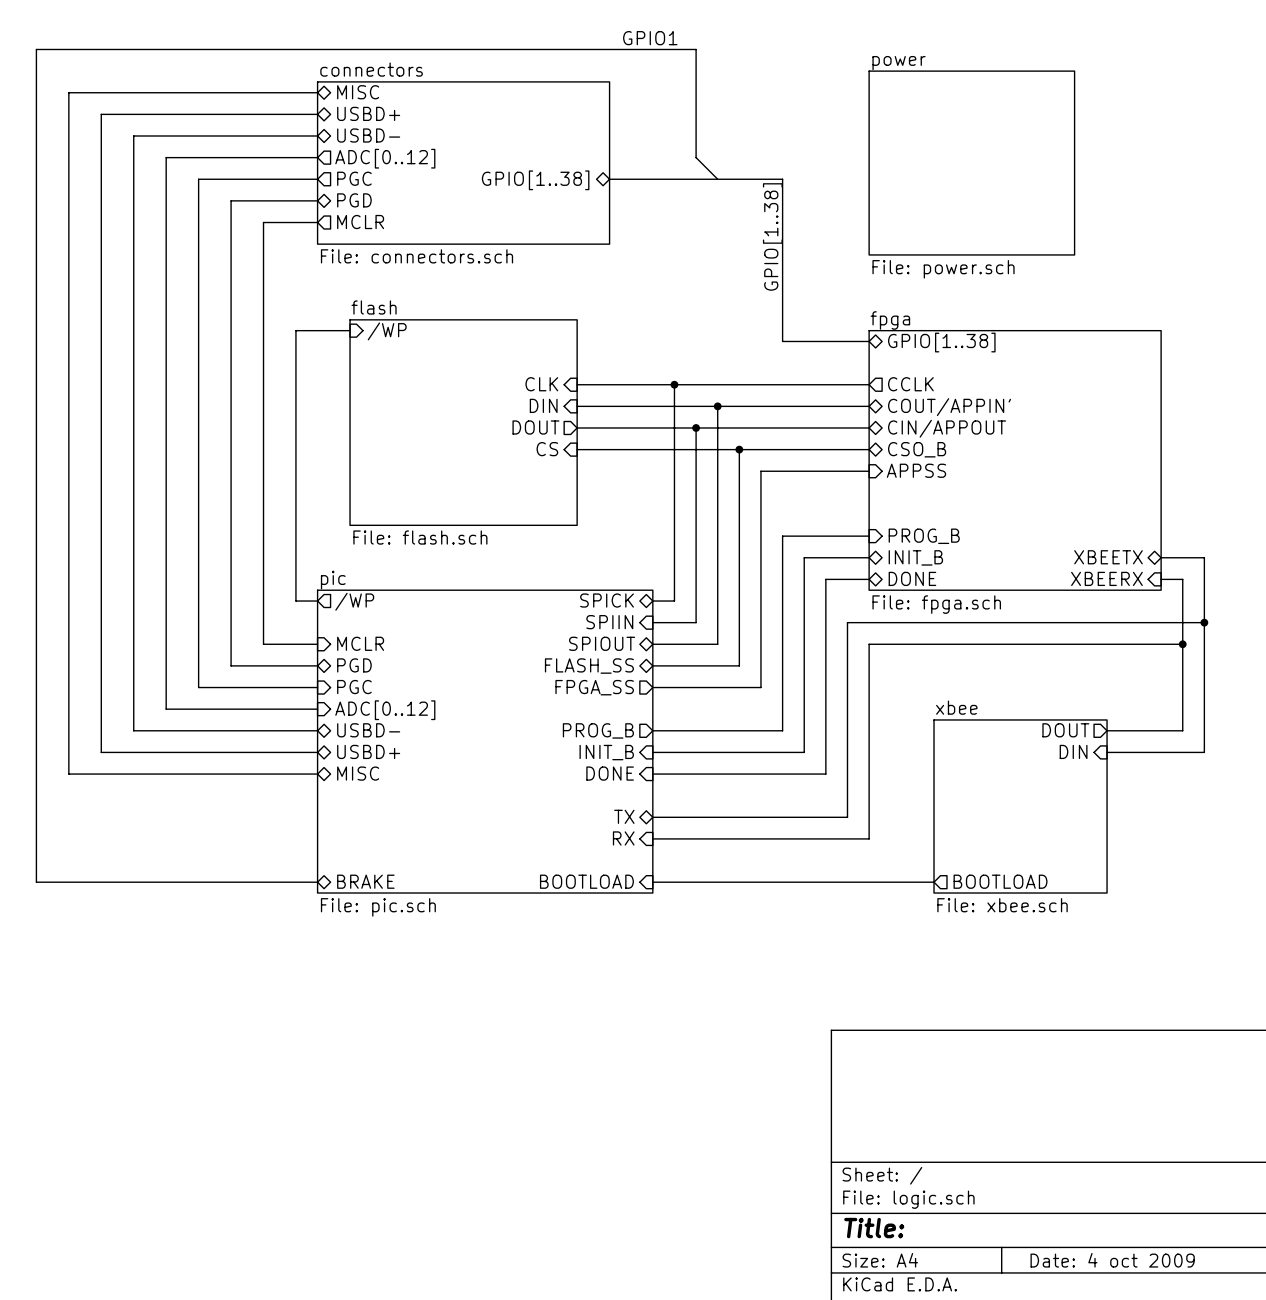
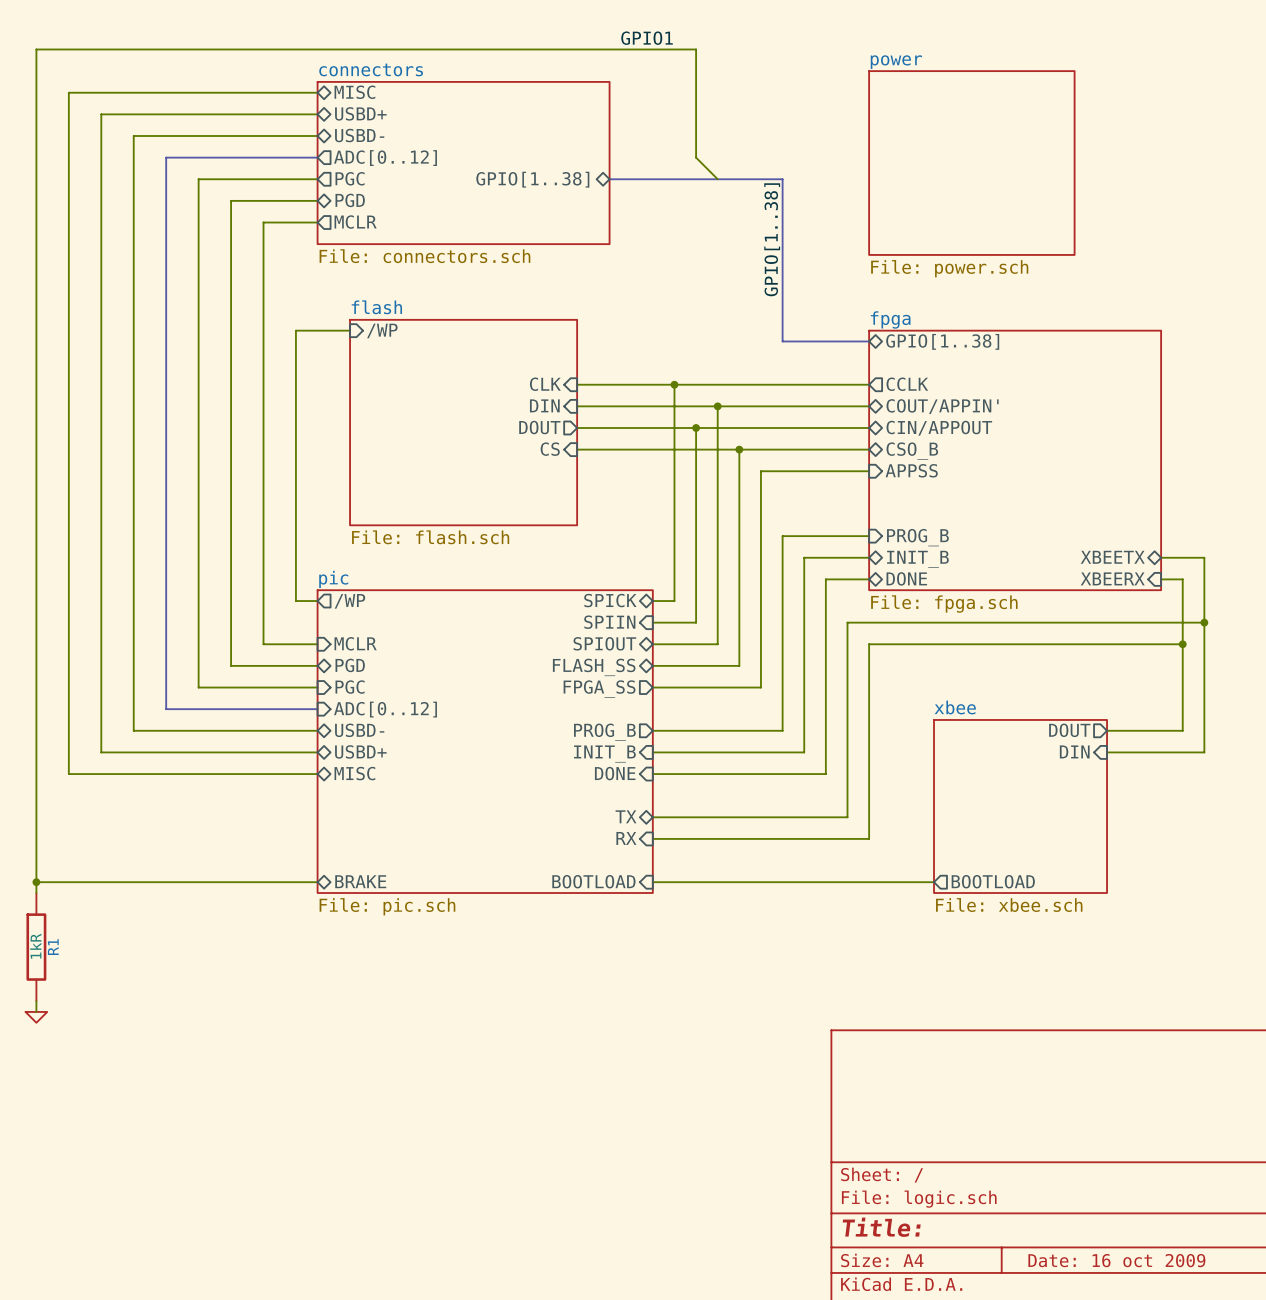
wire: none -> (36, 882) (36, 893)
junction: none -> (36, 882)
R1: none -> 1kR (36, 947)
wire: none -> (36, 1001) (36, 1011)
power symbol: none -> (36, 1017)
title block: Date: 4 oct 2009 (1112, 1260) -> Date: 16 oct 2009 (1116, 1260)

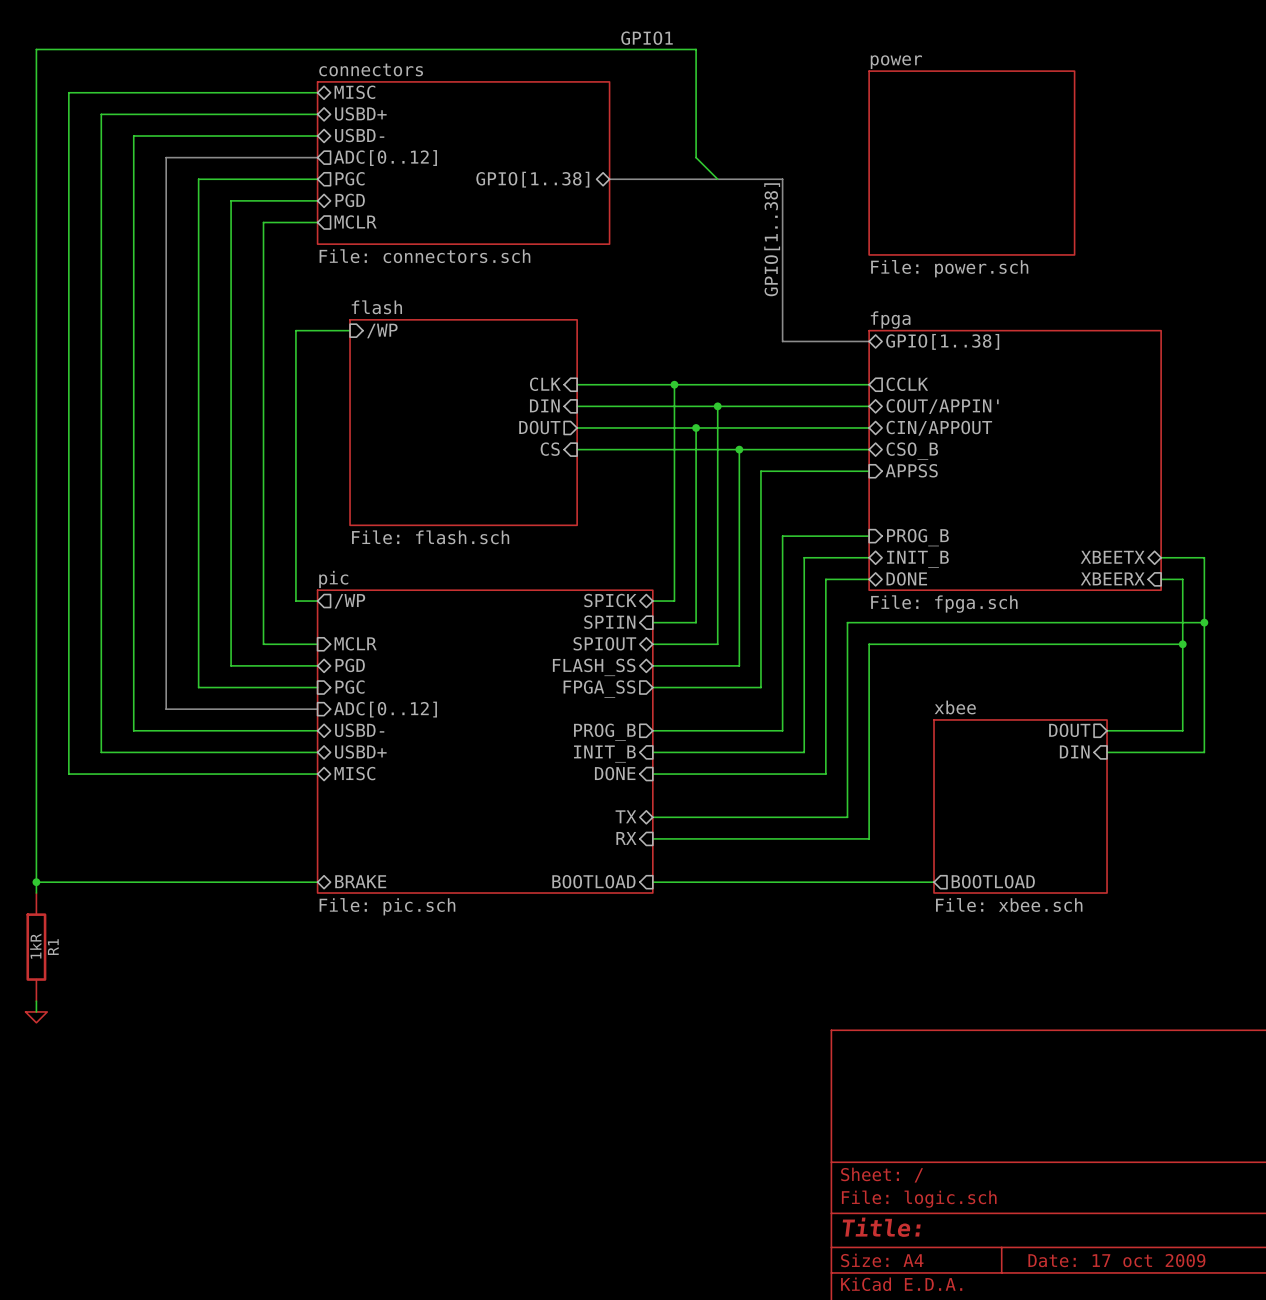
title block: Date: 16 oct 2009 (1116, 1260) -> Date: 17 oct 2009 (1116, 1260)

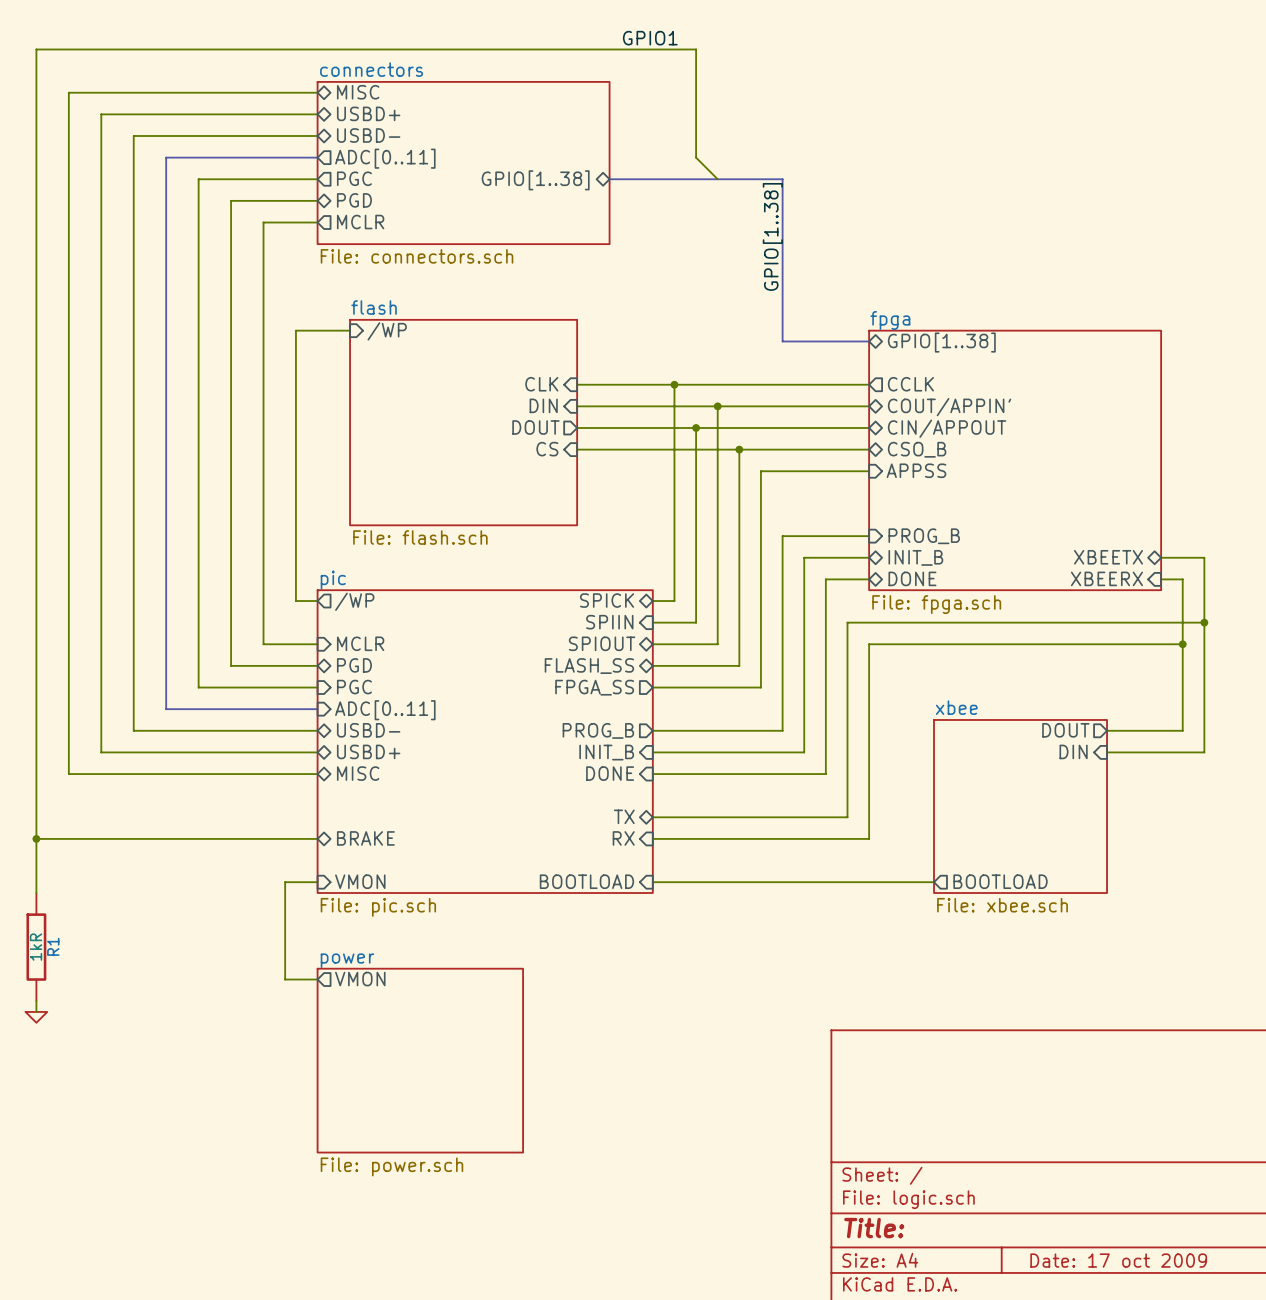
sheet pin: ADC[0..12] (385, 158) -> ADC[0..11] (385, 158)
sheet power: File: power.sch (971, 163) -> none
sheet pin: ADC[0..12] (385, 709) -> ADC[0..11] (385, 710)
wire: none -> (36, 838) (317, 838)
sheet pin: none -> BRAKE (365, 838)
sheet pin shape: bidirectional (360, 881) -> input (360, 881)
sheet pin: BRAKE (360, 881) -> VMON (360, 881)
wire: (36, 882) (285, 882) -> (317, 979) (285, 979) (285, 882)
junction position: (36, 882) -> (36, 838)
sheet pin: none -> VMON (360, 979)
sheet power: none -> File: power.sch (420, 1060)

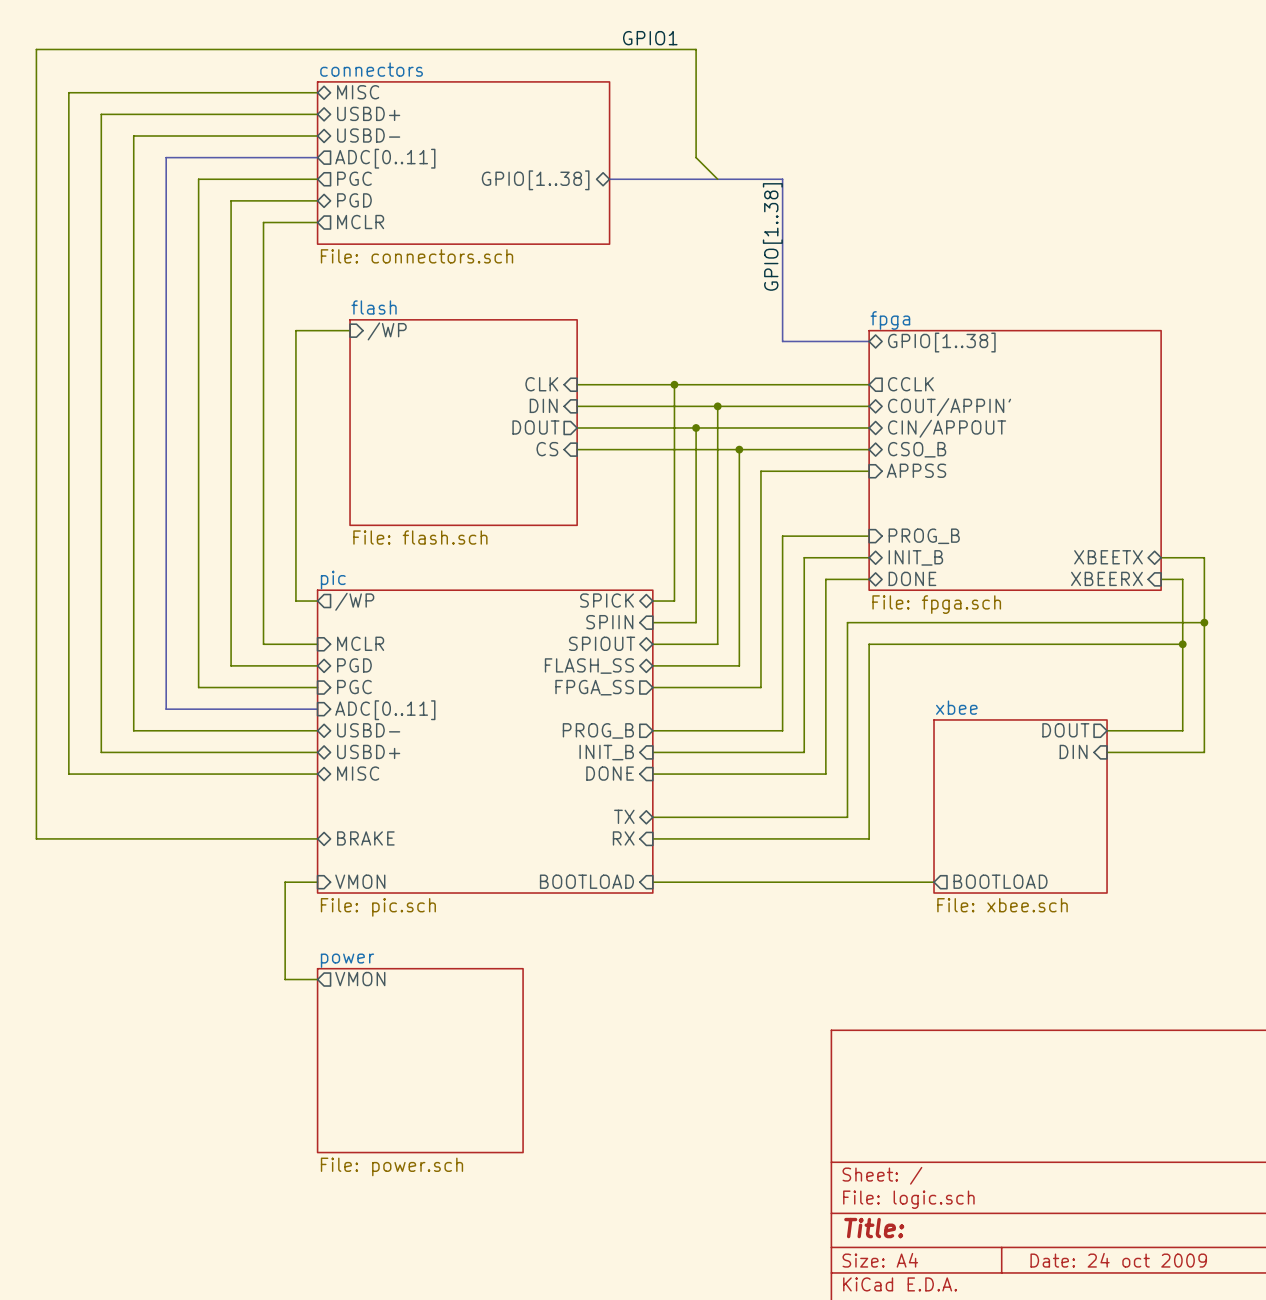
wire: (36, 838) (36, 893) -> none
junction: (36, 838) -> none
R1: 1kR (36, 947) -> none
wire: (36, 1001) (36, 1011) -> none
power symbol: (36, 1017) -> none
title block: Date: 17 oct 2009 (1118, 1260) -> Date: 24 oct 2009 (1118, 1260)

